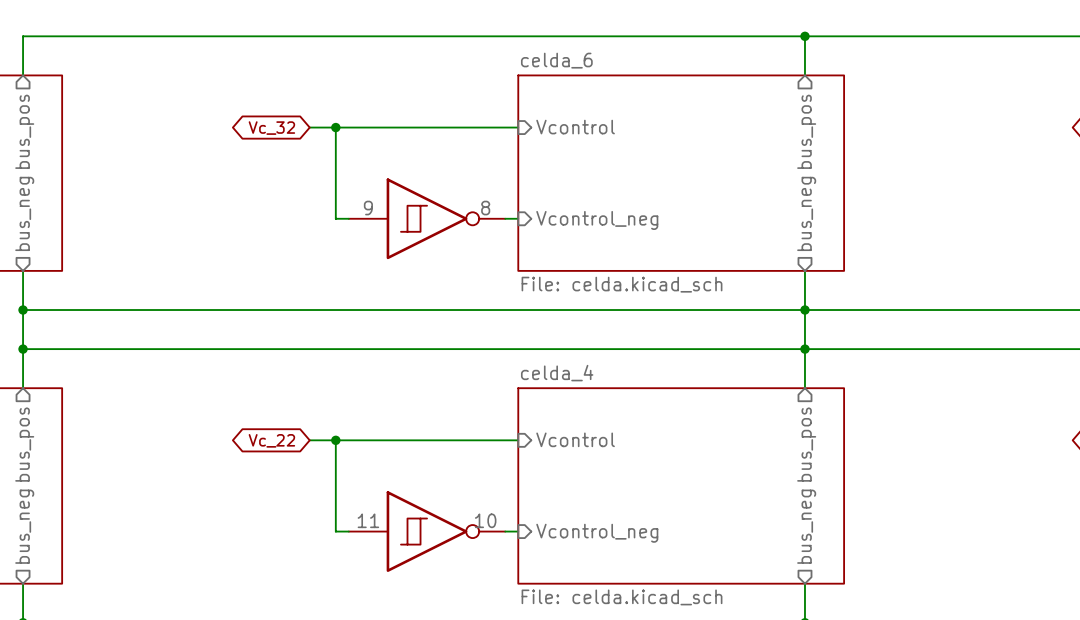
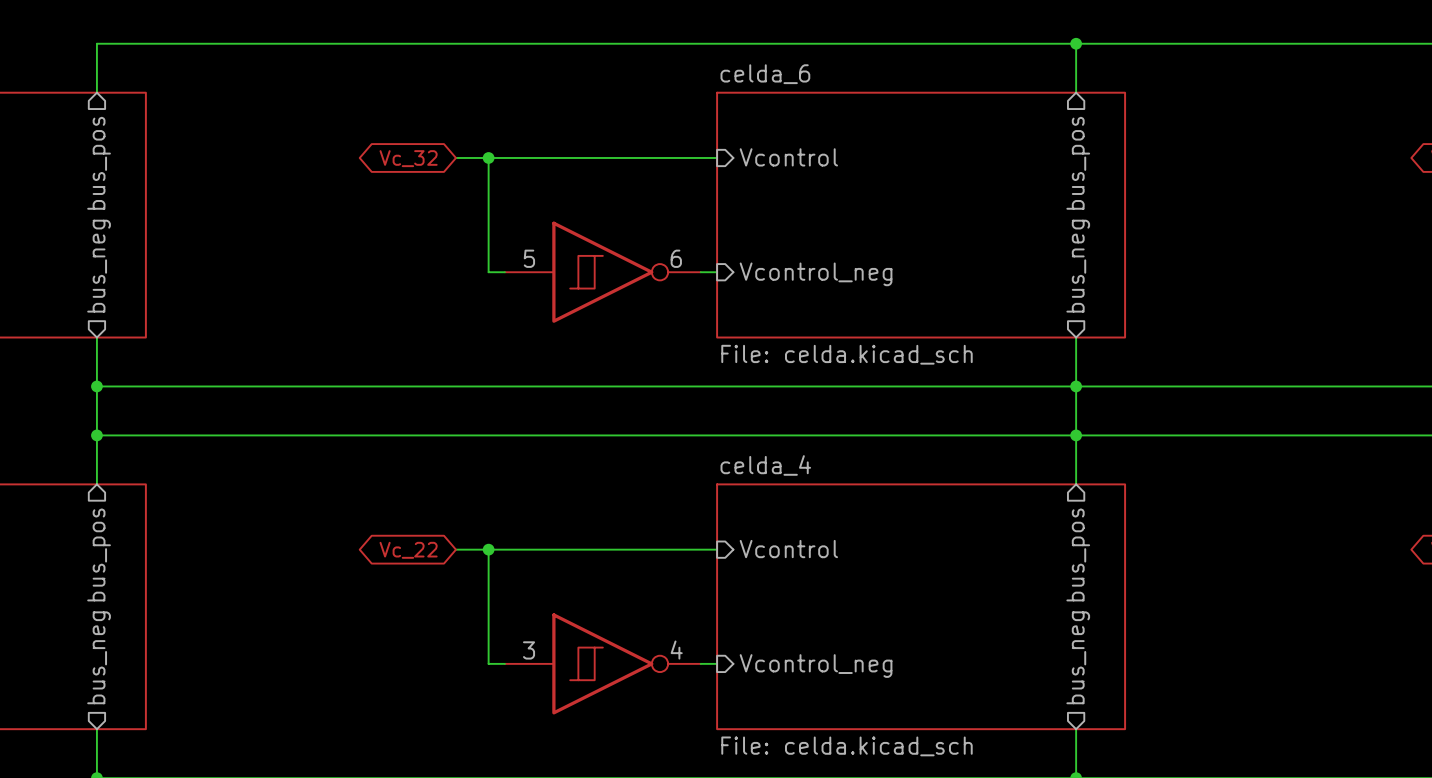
part pin number: 9 (368, 208) -> 5 (529, 258)
part pin number: 8 (485, 208) -> 6 (676, 258)
part pin number: 11 (368, 520) -> 3 (529, 650)
part pin number: 10 (485, 520) -> 4 (676, 650)

